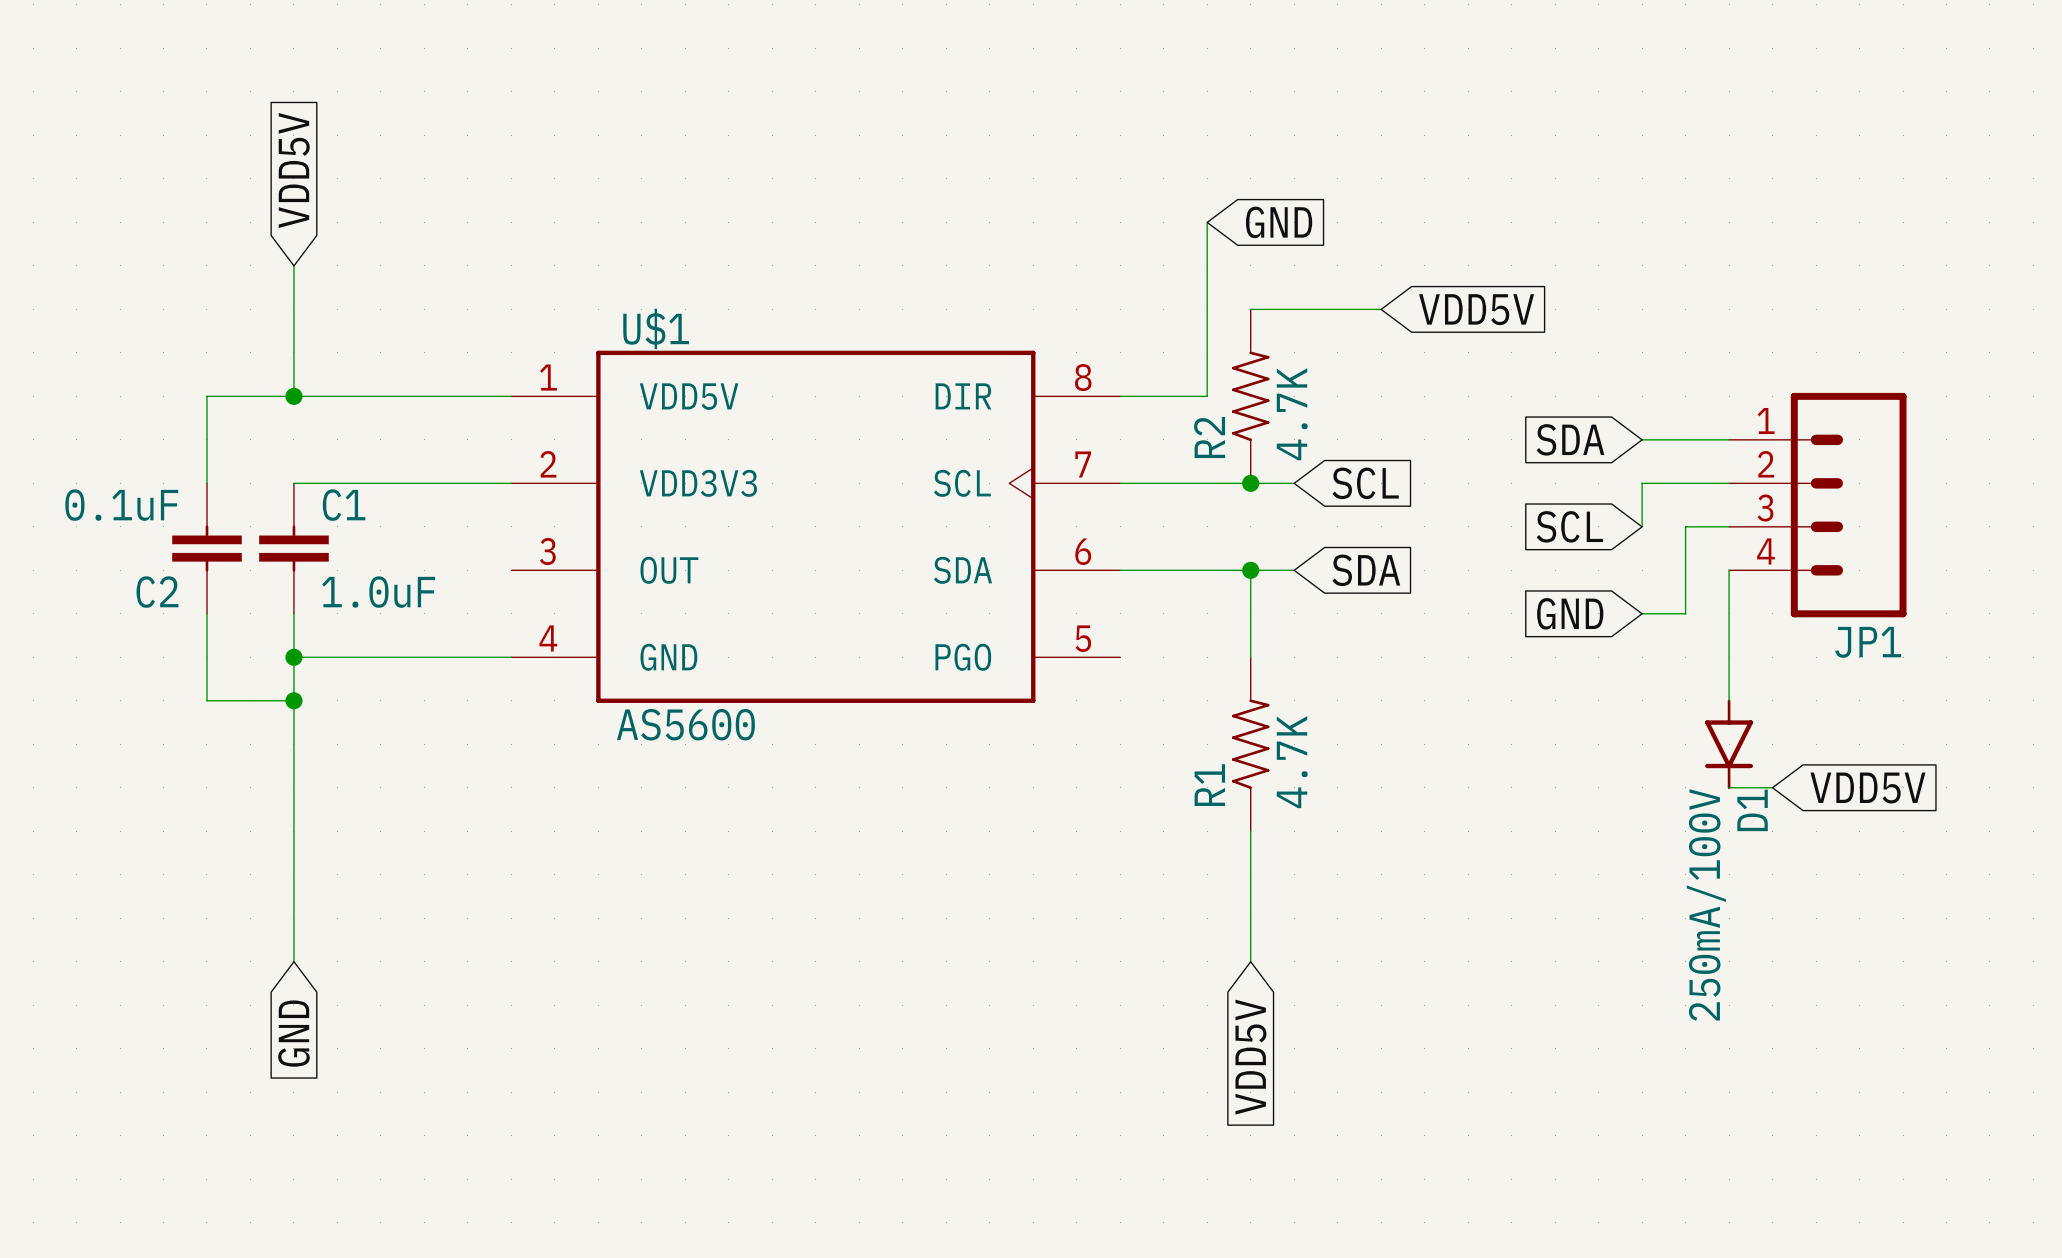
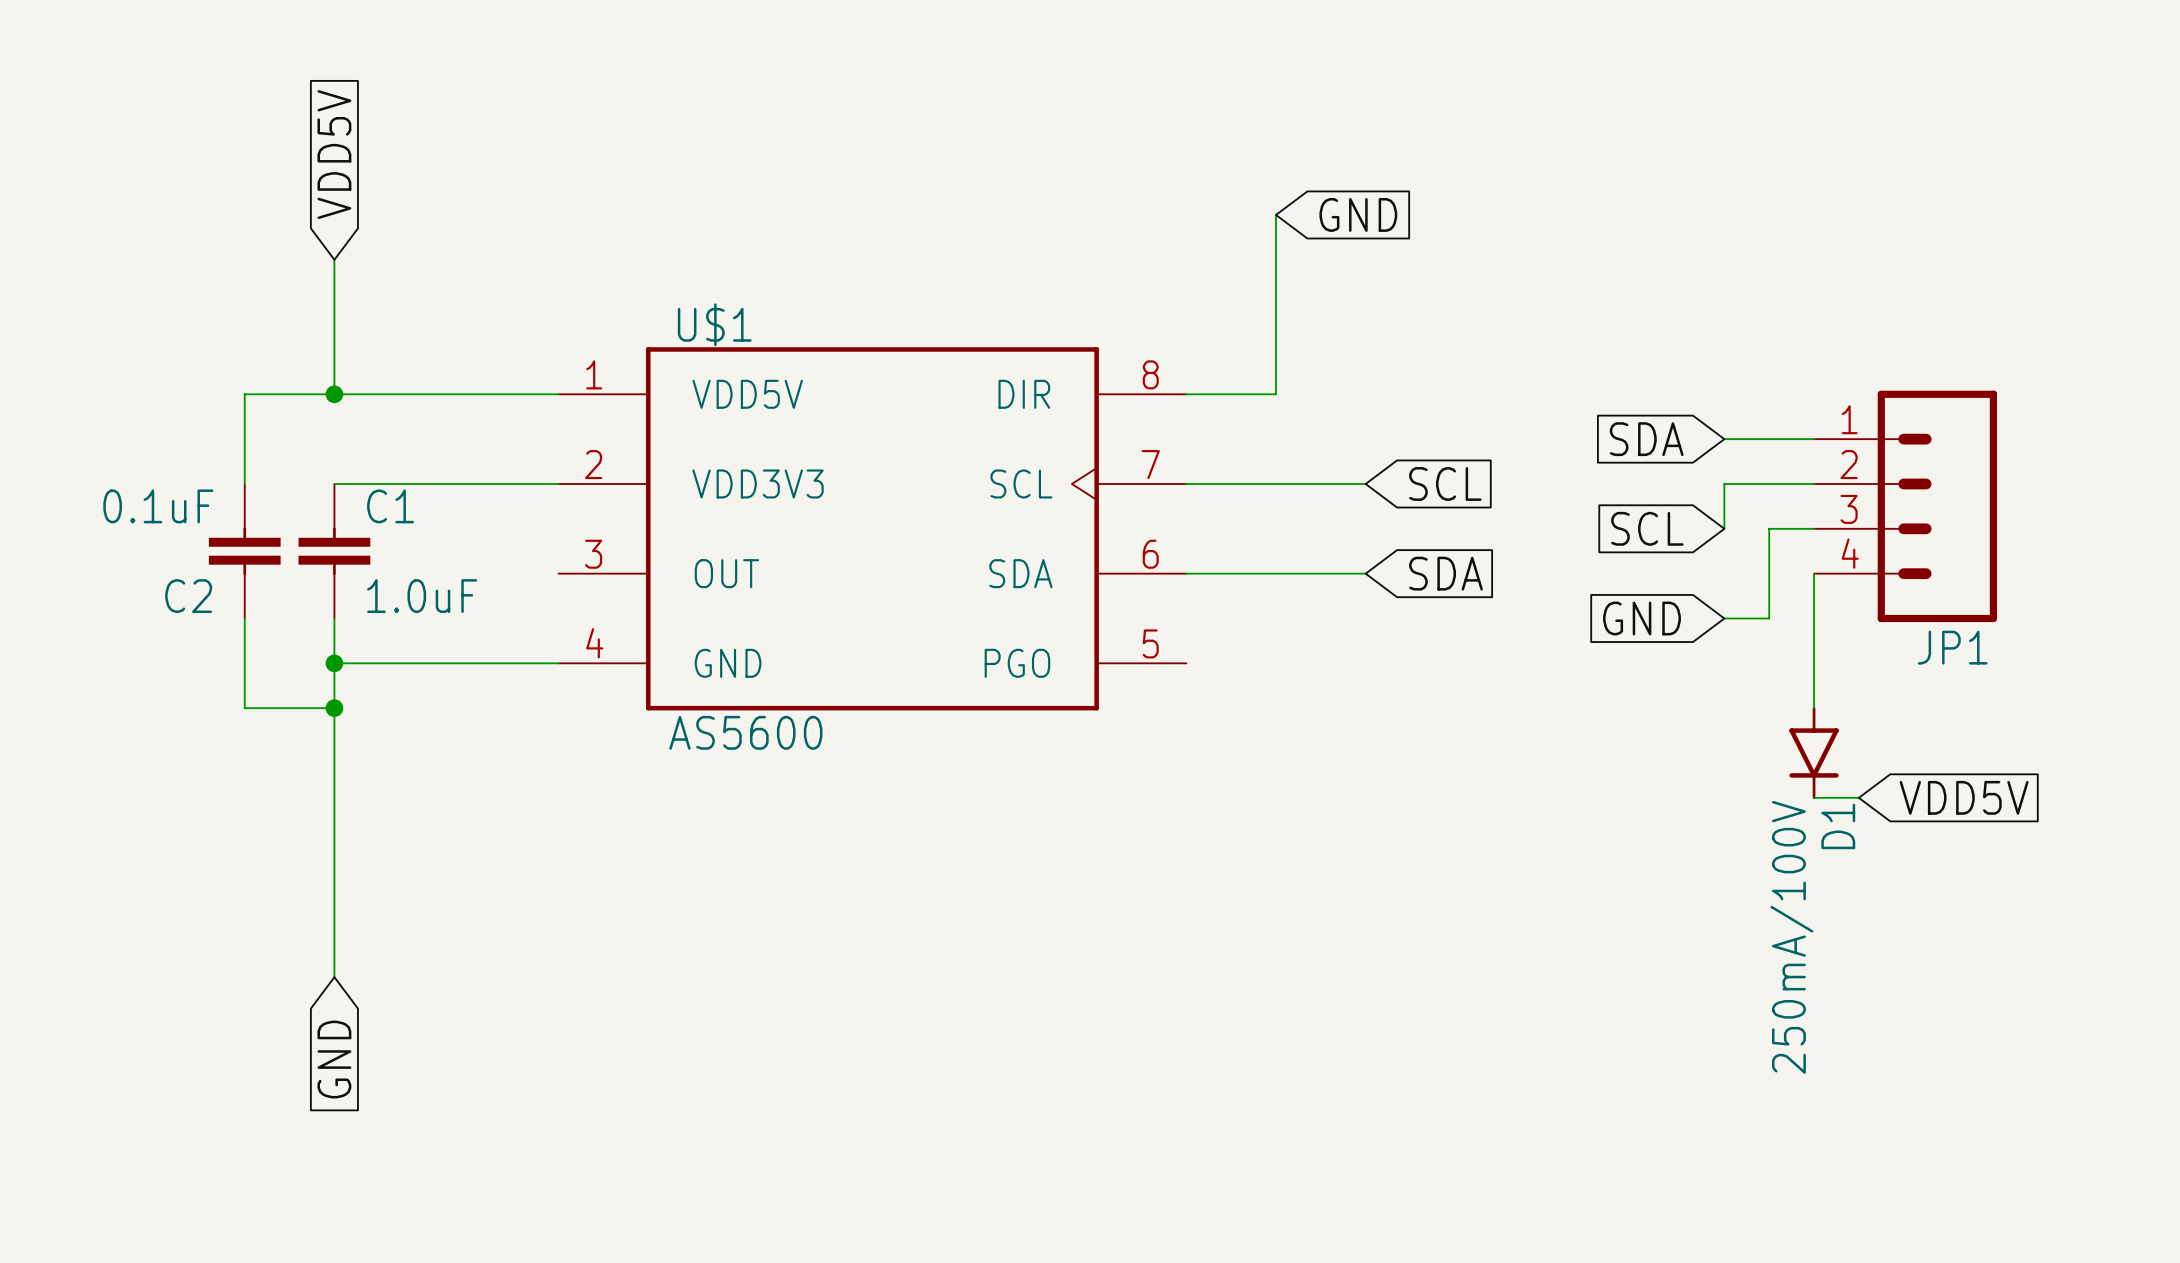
wire: (1250, 309) (1381, 309) -> none
global label: VDD5V (1476, 309) -> none
R2: 4.7K (1250, 396) -> none
junction: (1250, 483) -> none
wire: (1250, 570) (1250, 657) -> none
junction: (1250, 570) -> none
R1: 4.7K (1250, 744) -> none
wire: (1250, 831) (1250, 961) -> none
global label: VDD5V (1250, 1057) -> none

